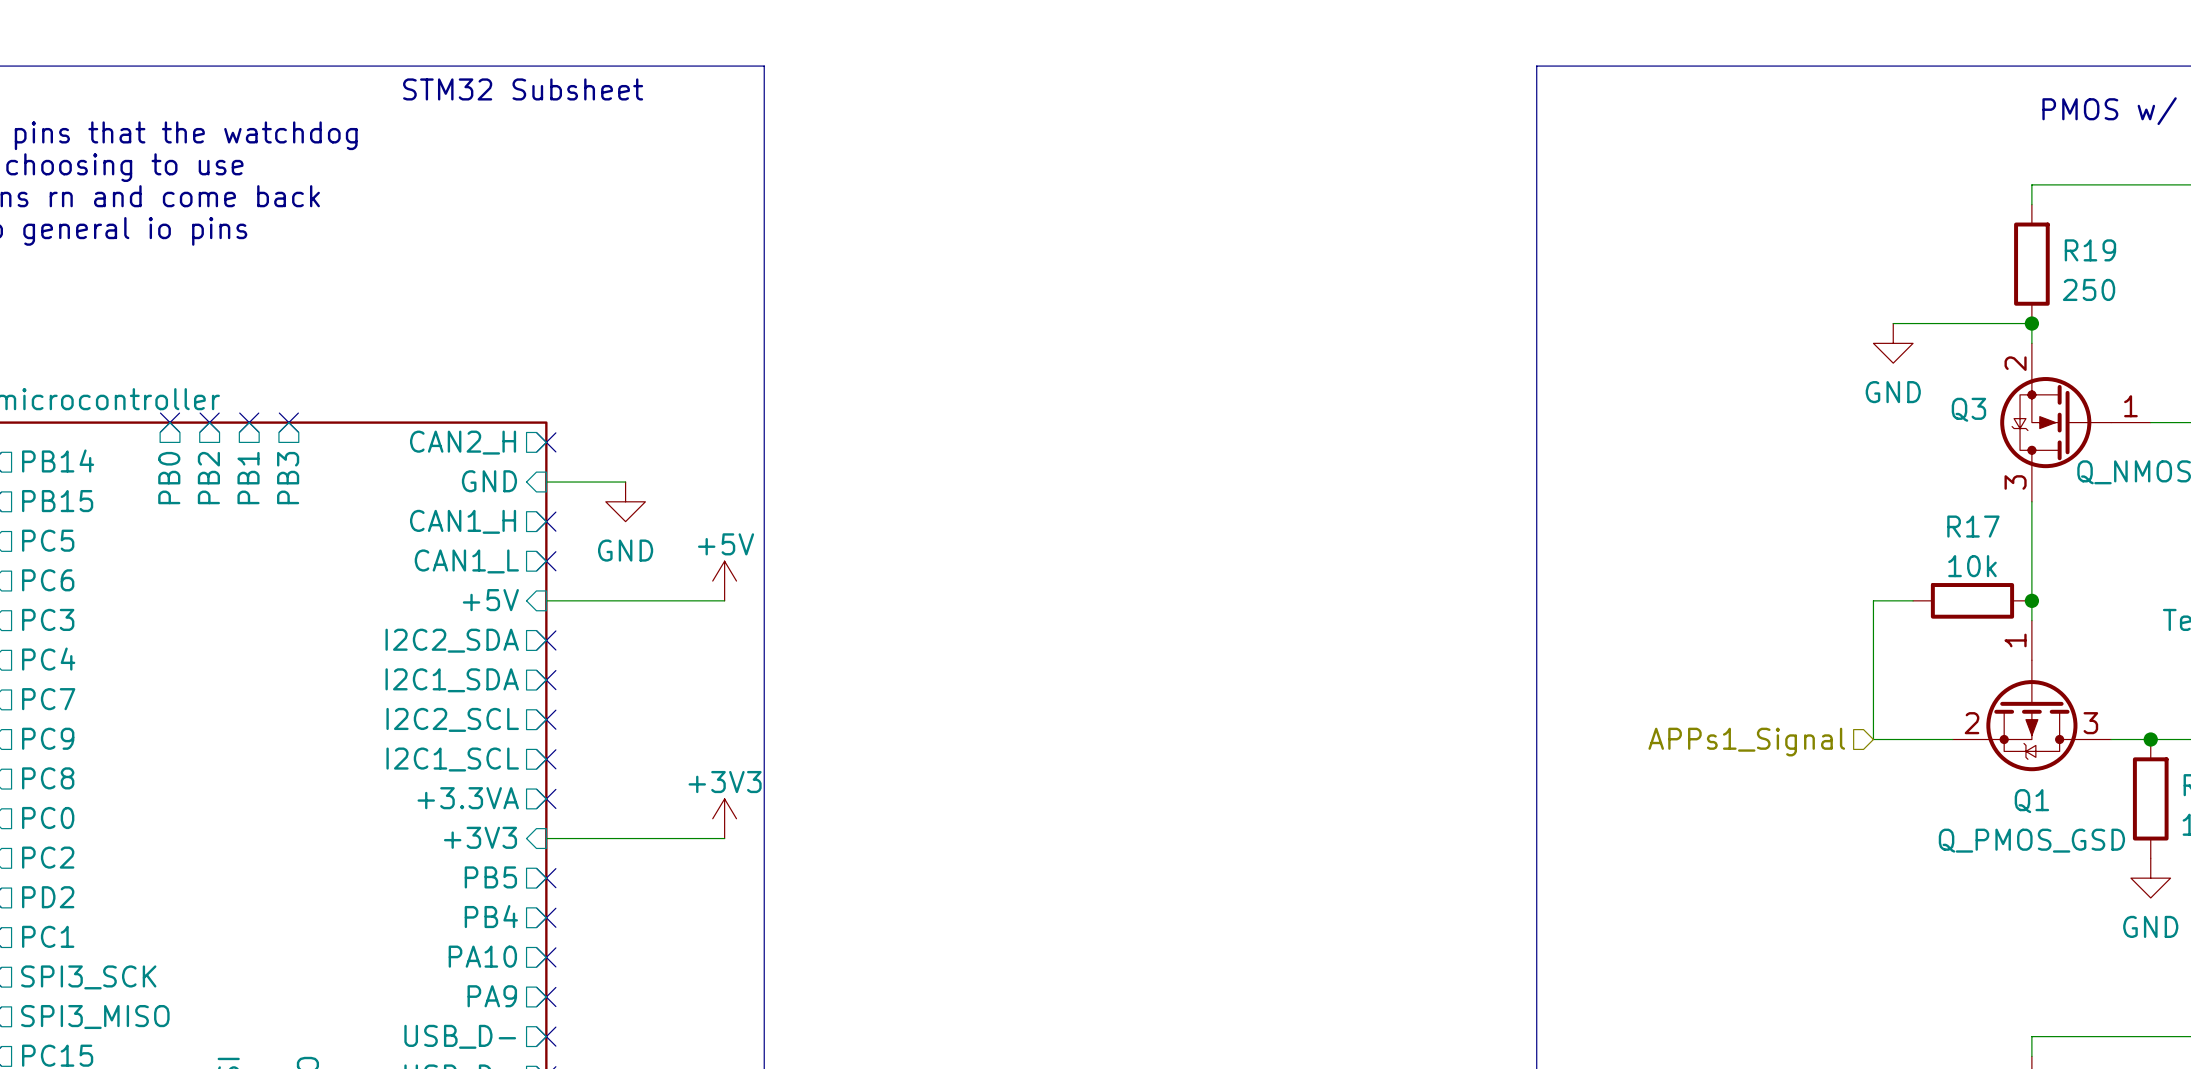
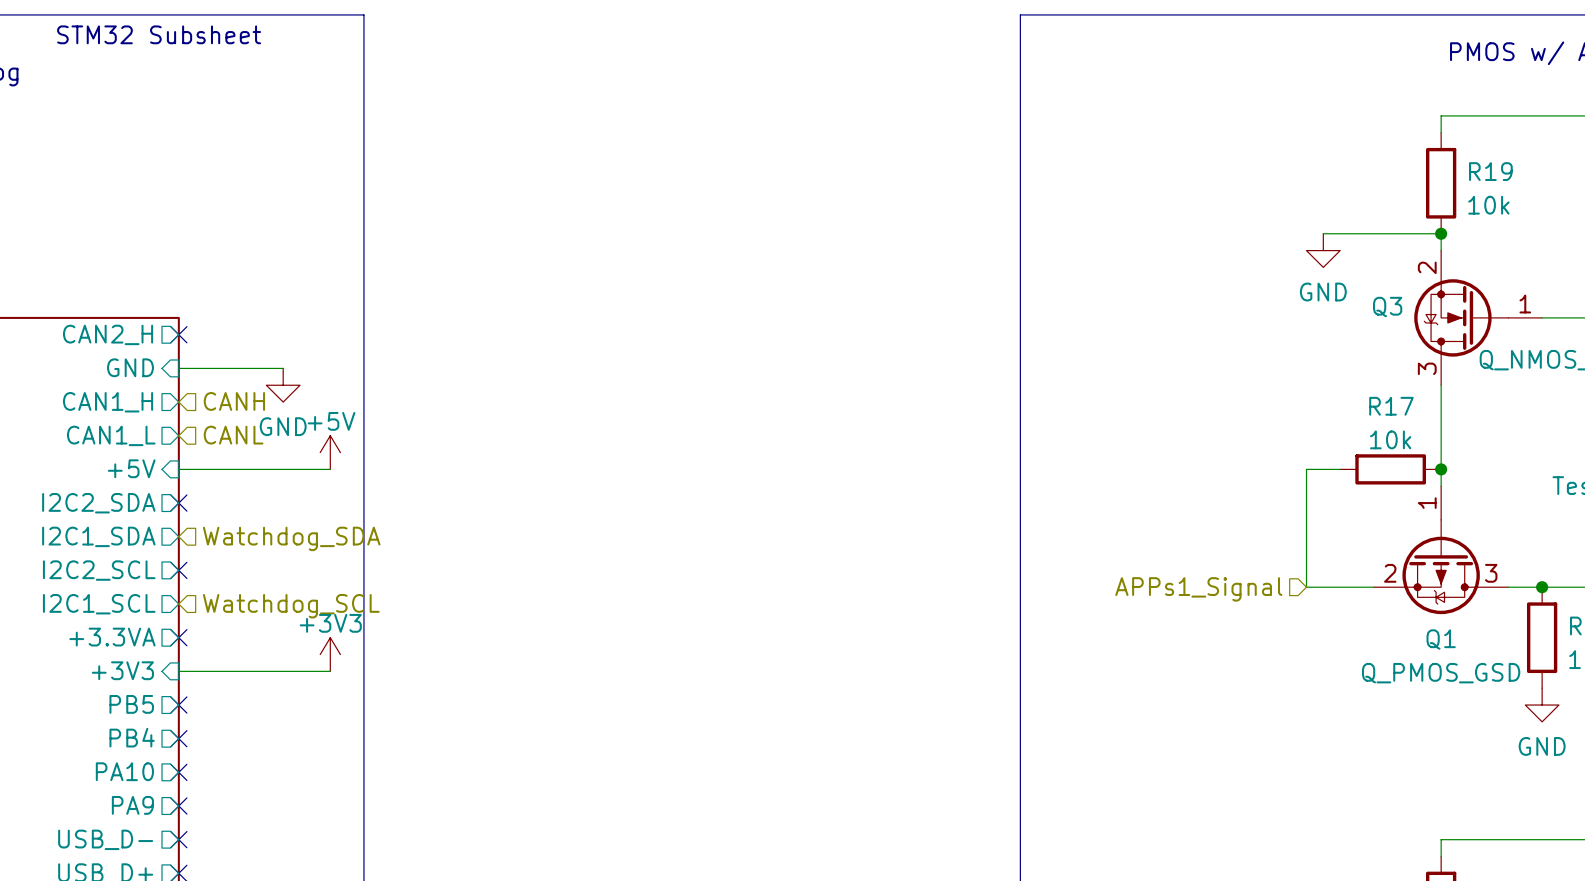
R19 value: 250 (2089, 289) -> 10k (1488, 205)
wire: none -> (246, 368) (283, 368)
power symbol position: GND (625, 501) -> GND (283, 385)
hierarchical label: none -> CANH (234, 401)
no-connect mark: (546, 521) -> none
hierarchical label: none -> CANL (233, 435)
no-connect mark: (546, 561) -> none
no-connect mark: (546, 680) -> none
hierarchical label: none -> Watchdog_SDA (291, 538)
no-connect mark: (546, 759) -> none
hierarchical label: none -> Watchdog_SCL (291, 606)

